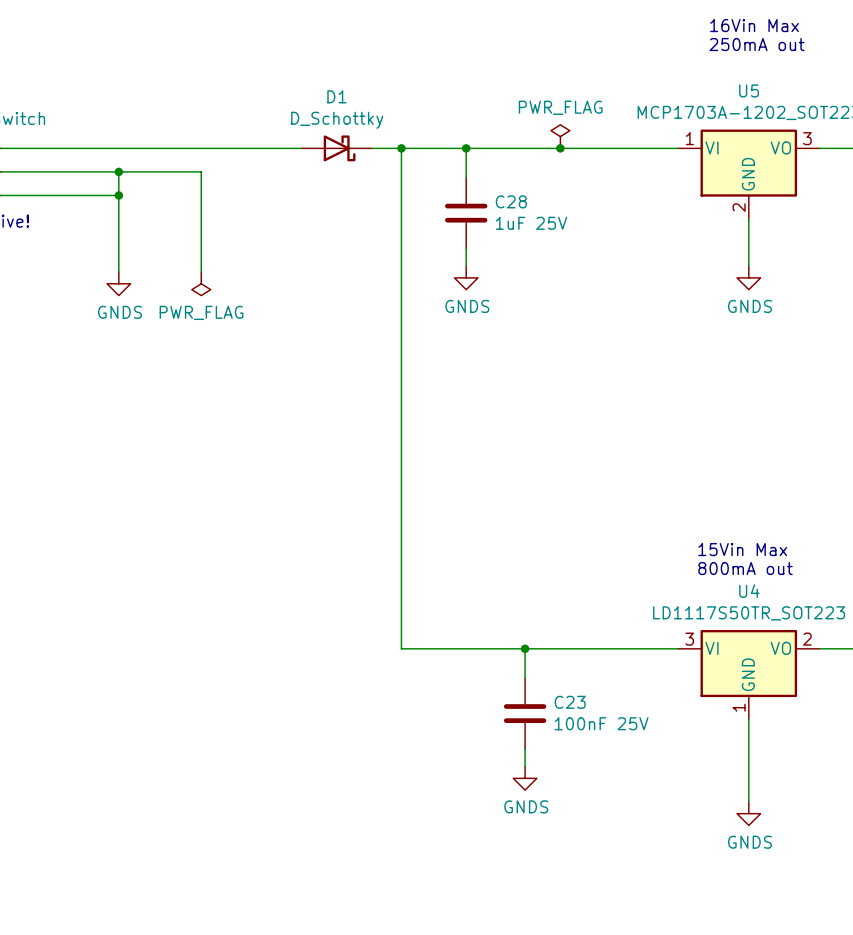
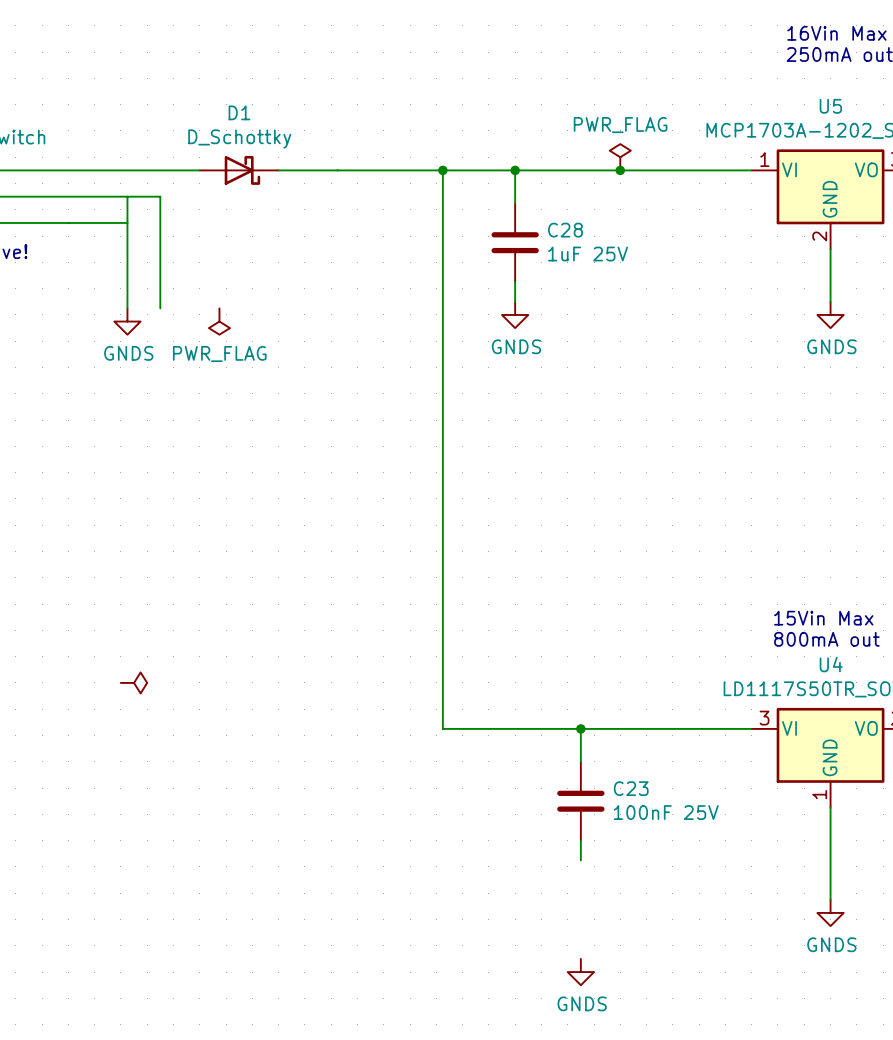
D1 position: (336, 148) -> (239, 170)
junction: (118, 171) -> none
wire: (148, 171) (201, 171) (201, 272) -> (160, 196) (160, 308)
junction: (118, 195) -> none
power symbol: none -> (134, 682)
power symbol position: GNDS (525, 778) -> GNDS (580, 972)

